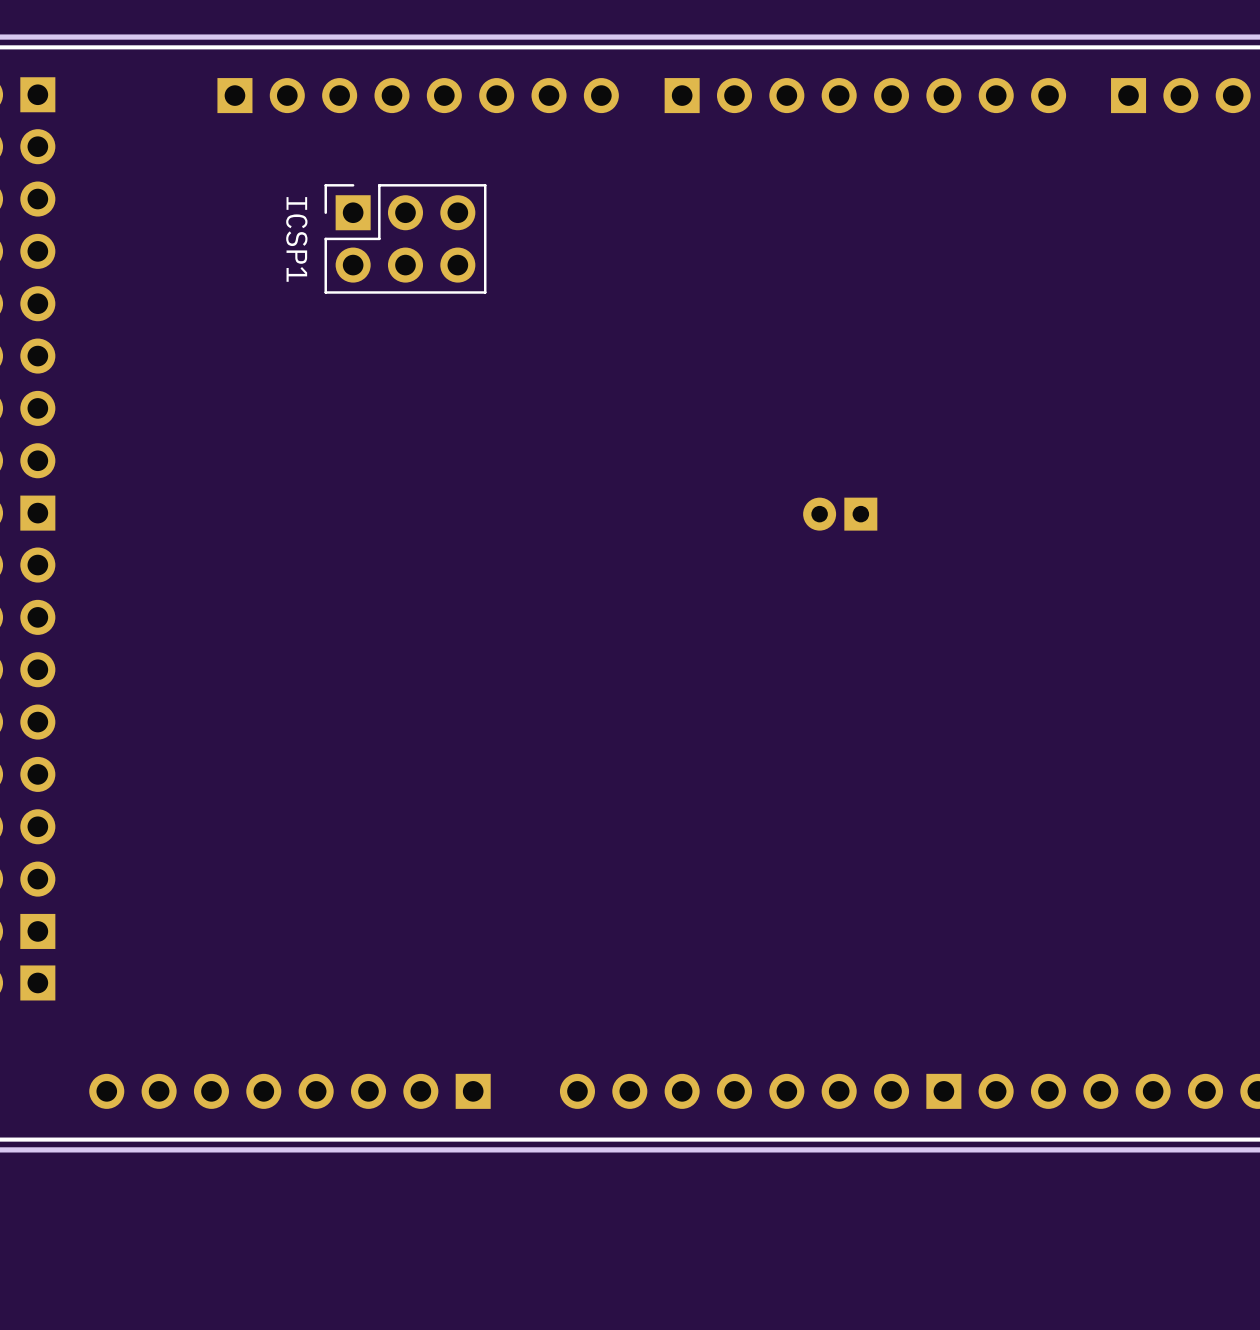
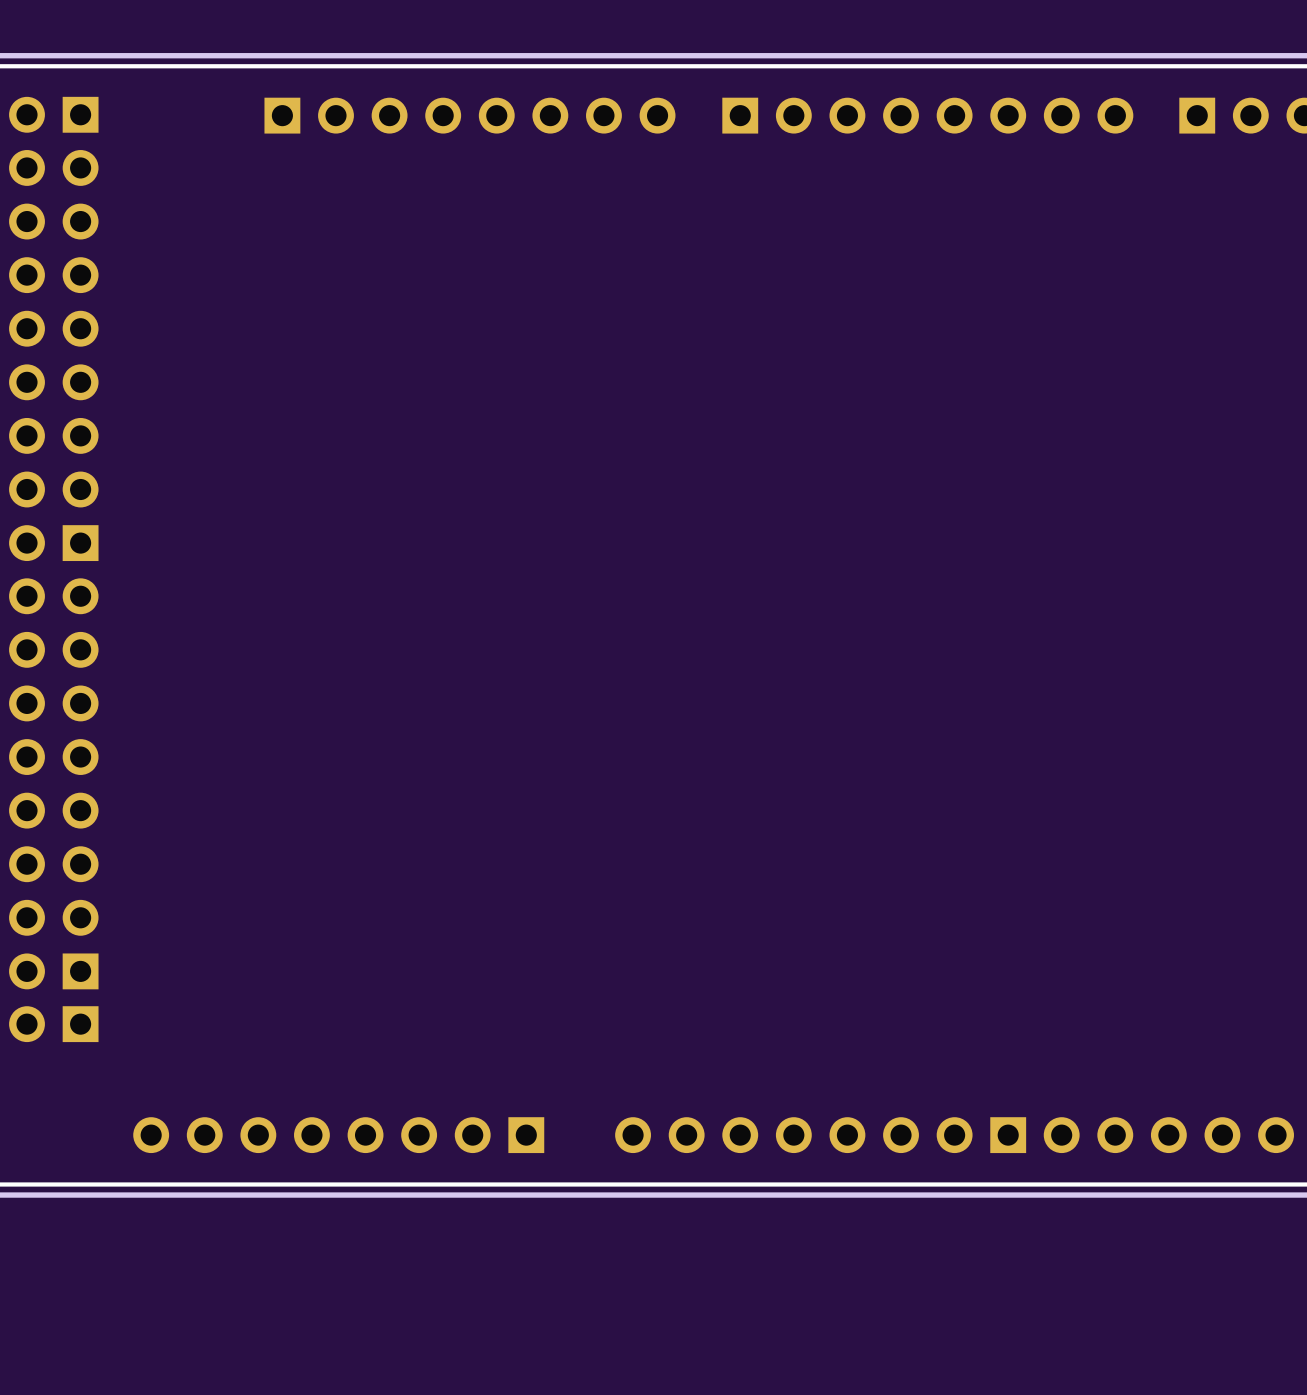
ICSP1: (405, 238) -> none
part: (840, 514) -> none

